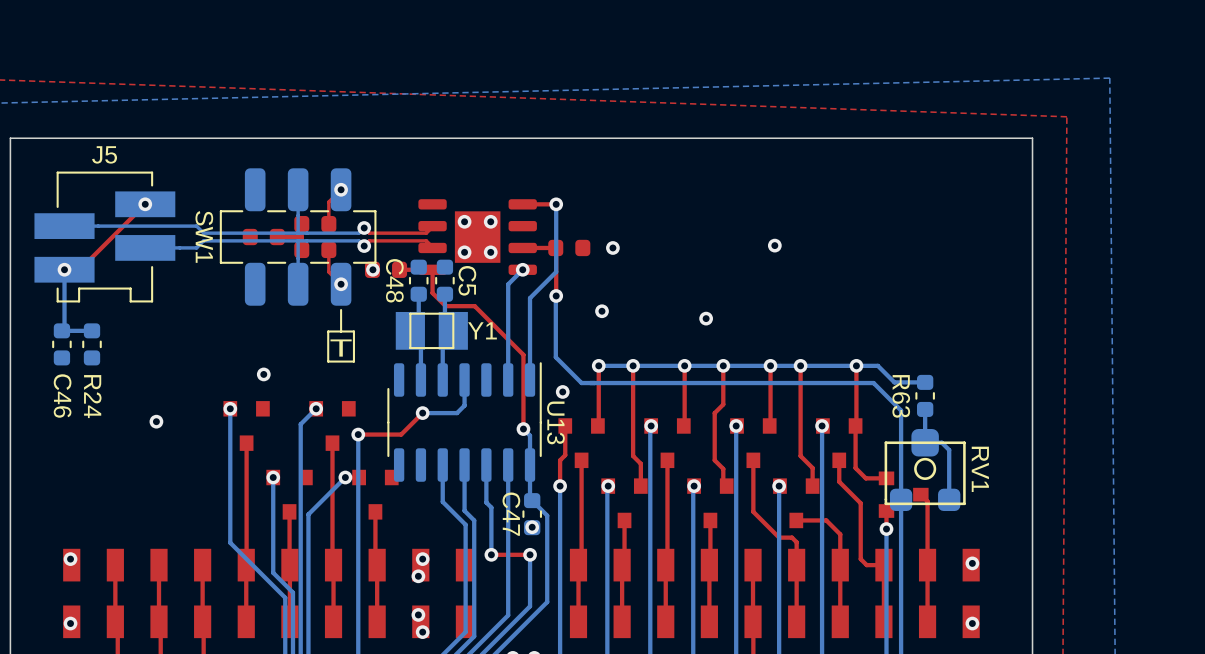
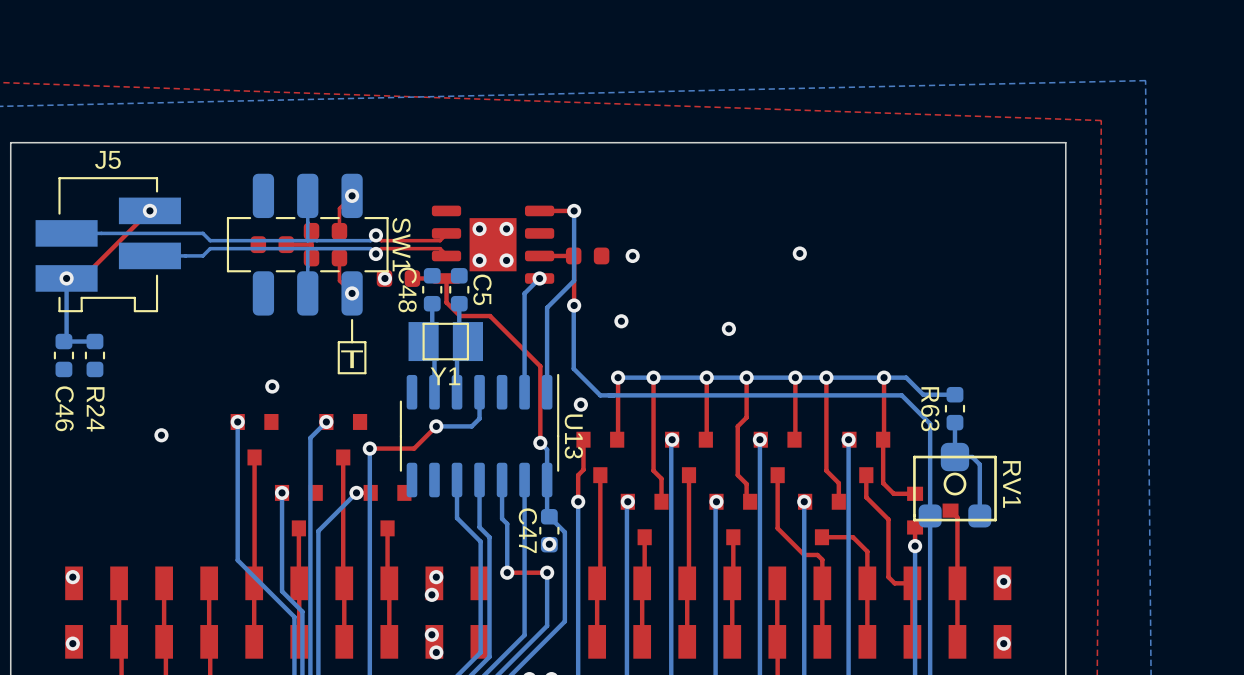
SW1 name position: SW1 (204, 236) -> SW1 (401, 244)
Y1 name position: Y1 (482, 330) -> Y1 (445, 376)

